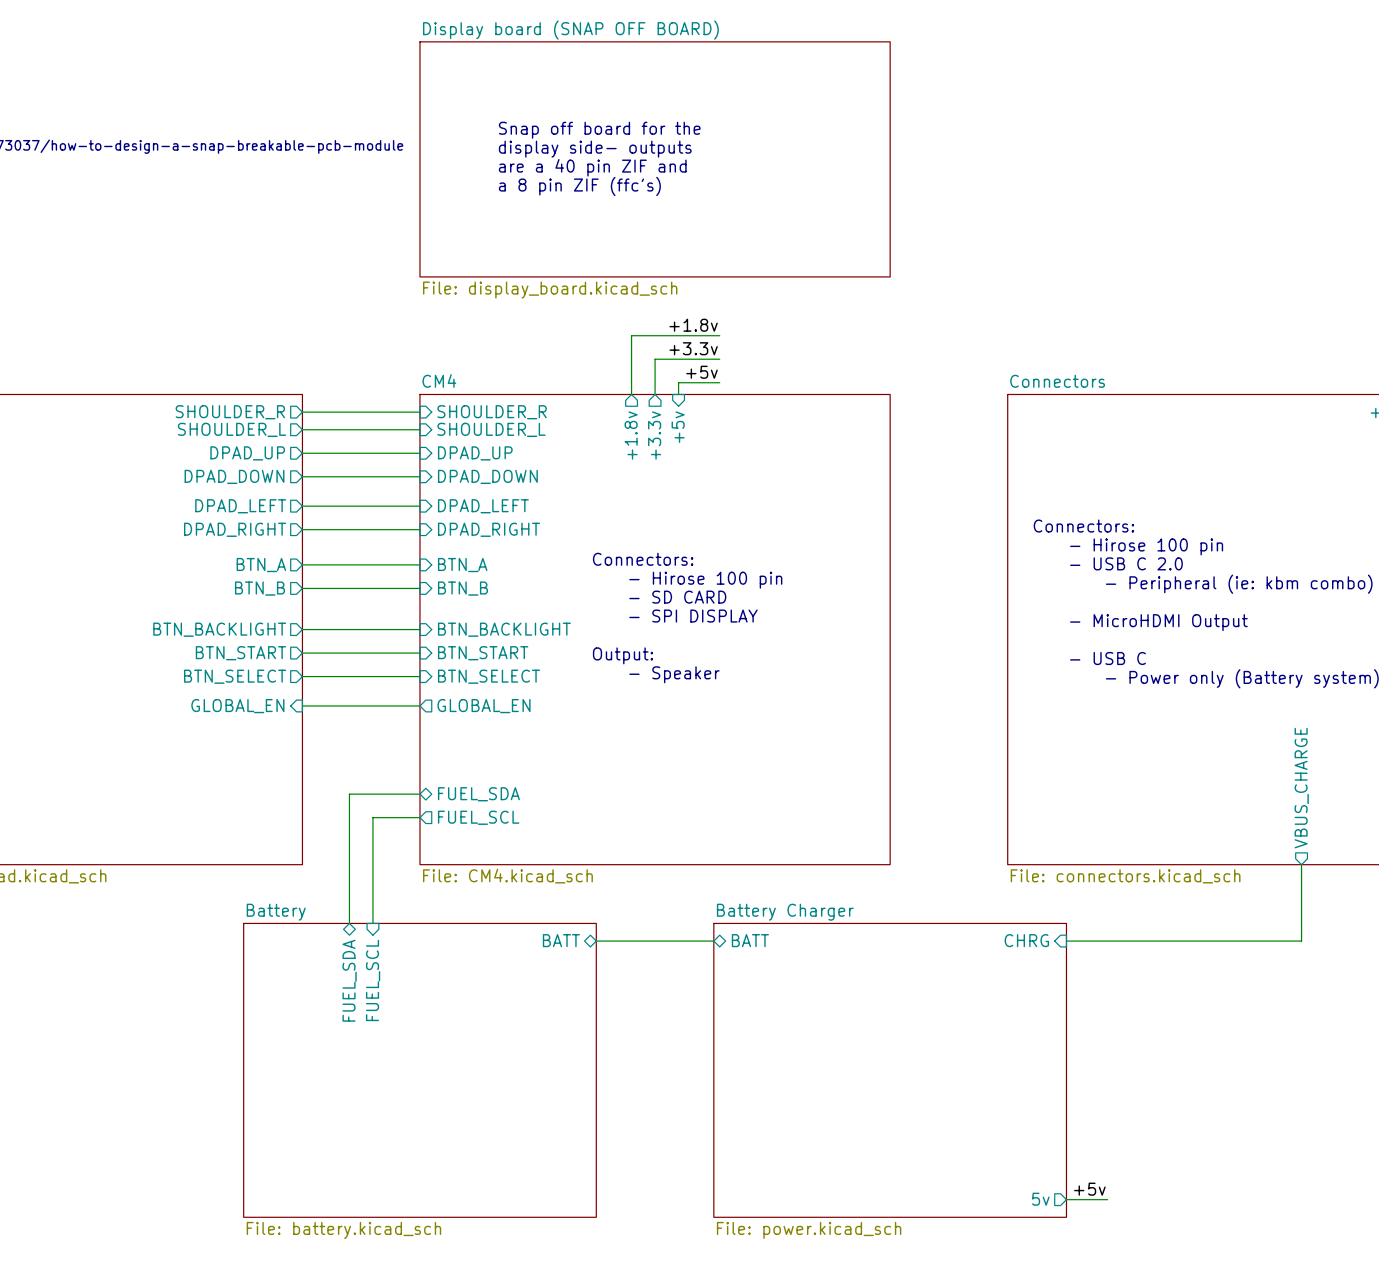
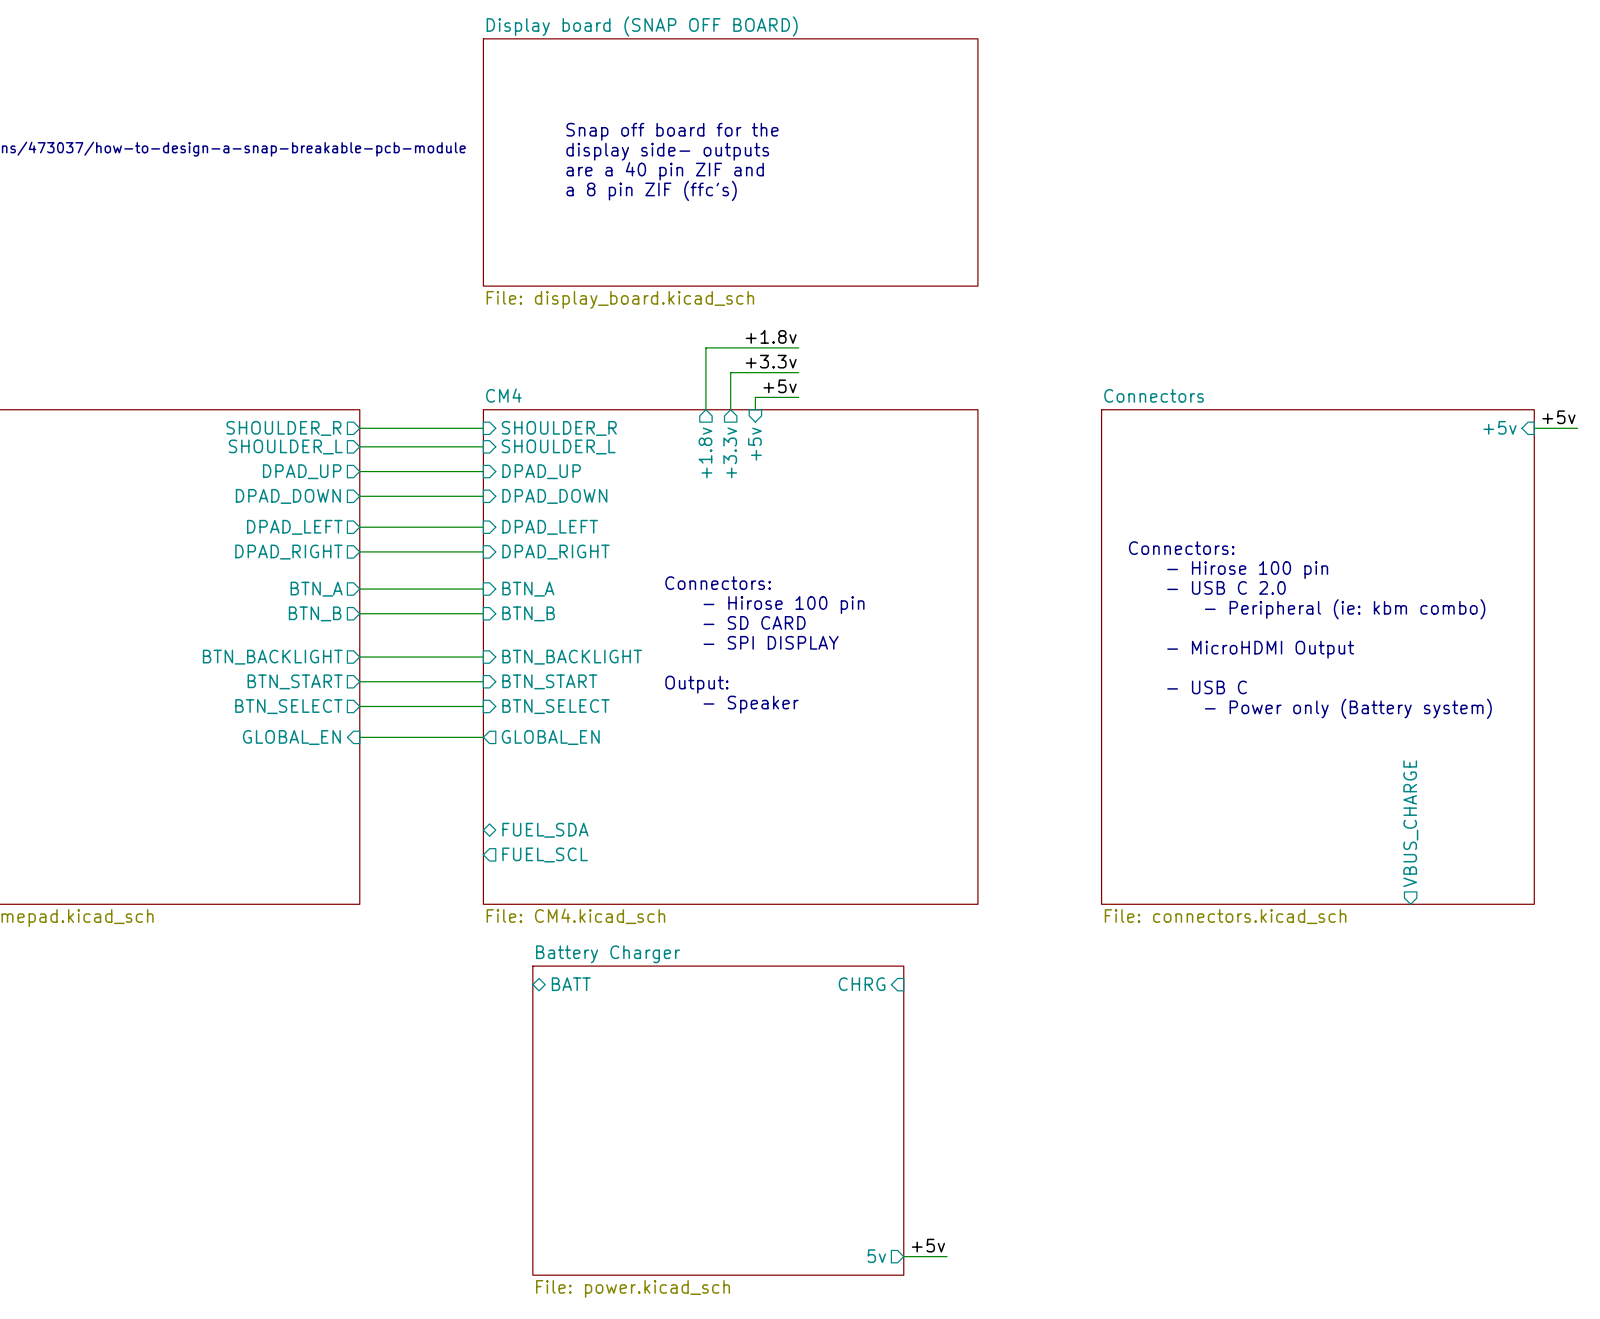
wire: (419, 794) (349, 794) (349, 923) -> none
wire: (419, 817) (372, 817) (372, 923) -> none
wire: (1301, 864) (1301, 941) (1066, 941) -> none
sheet pin rotation: 0° (561, 940) -> 180° (571, 984)
sheet pin position: BATT (561, 940) -> BATT (571, 984)
sheet pin: BATT (750, 940) -> none
sheet pin: none -> CHRG (862, 984)
sheet pin: CHRG (1026, 940) -> none
wire: (596, 941) (713, 941) -> none
sheet pin: FUEL_SDA (349, 980) -> none
sheet pin: FUEL_SCL (373, 980) -> none
sheet Battery: File: battery.kicad_sch (419, 1070) -> none
sheet Battery Charger: none -> File: power.kicad_sch (718, 1120)
sheet Battery Charger: File: power.kicad_sch (890, 1070) -> none
label: none -> +5v (928, 1245)
label: +5v (1089, 1189) -> none
sheet pin: none -> 5v (876, 1256)
wire: none -> (903, 1256) (947, 1256)
sheet pin: 5v (1040, 1199) -> none
wire: (1066, 1199) (1107, 1199) -> none

